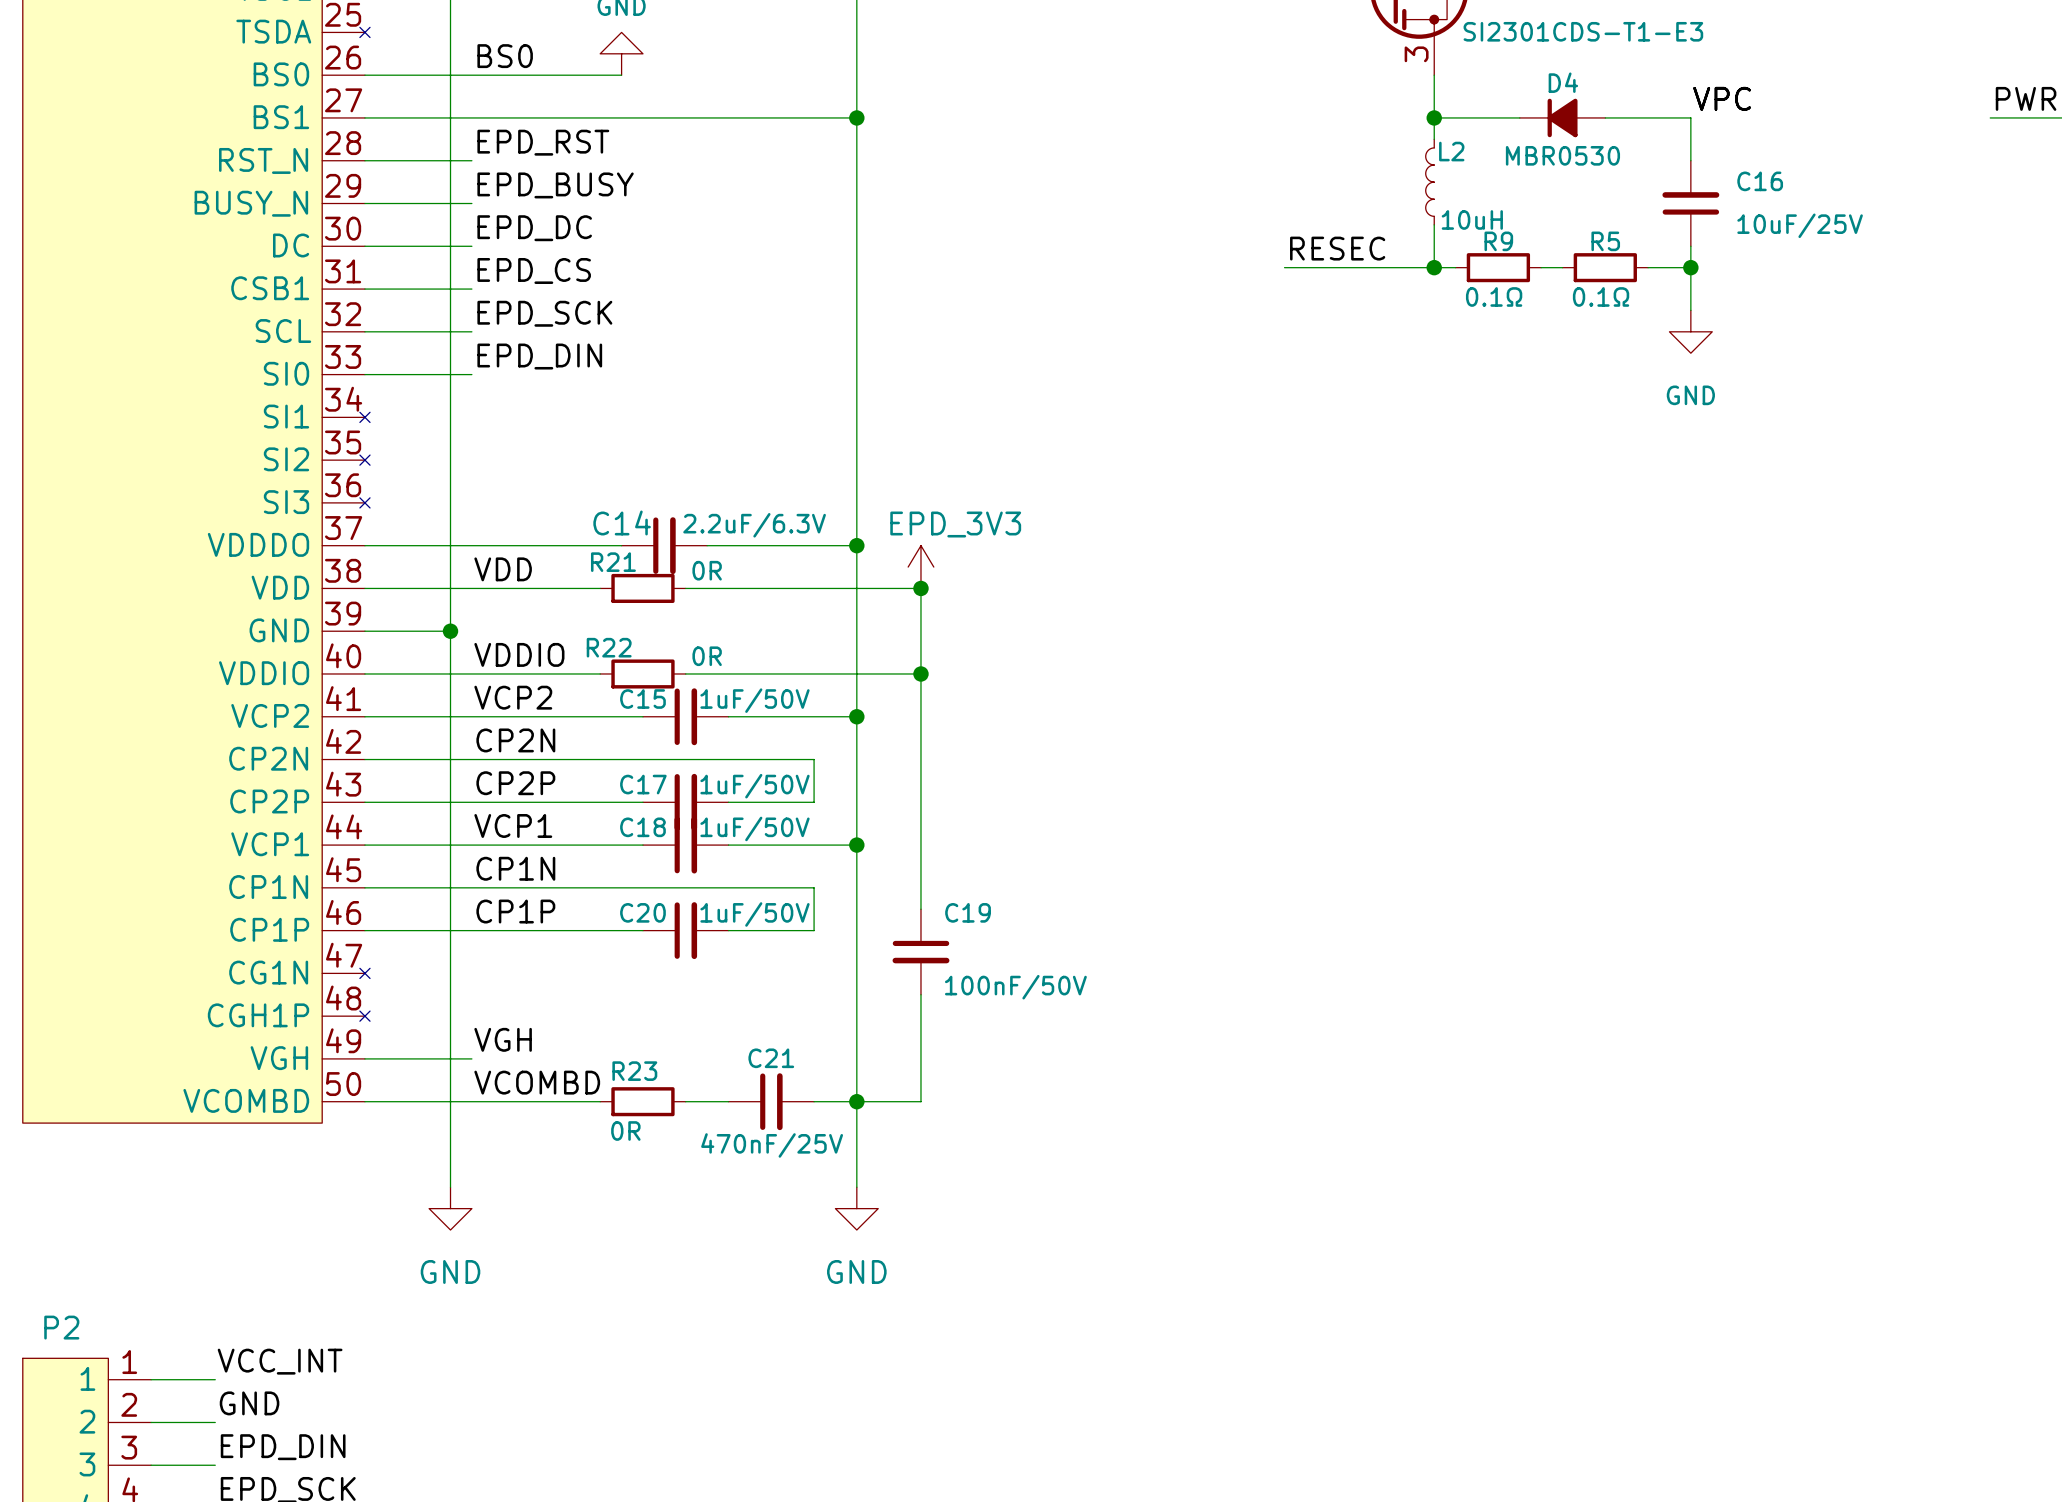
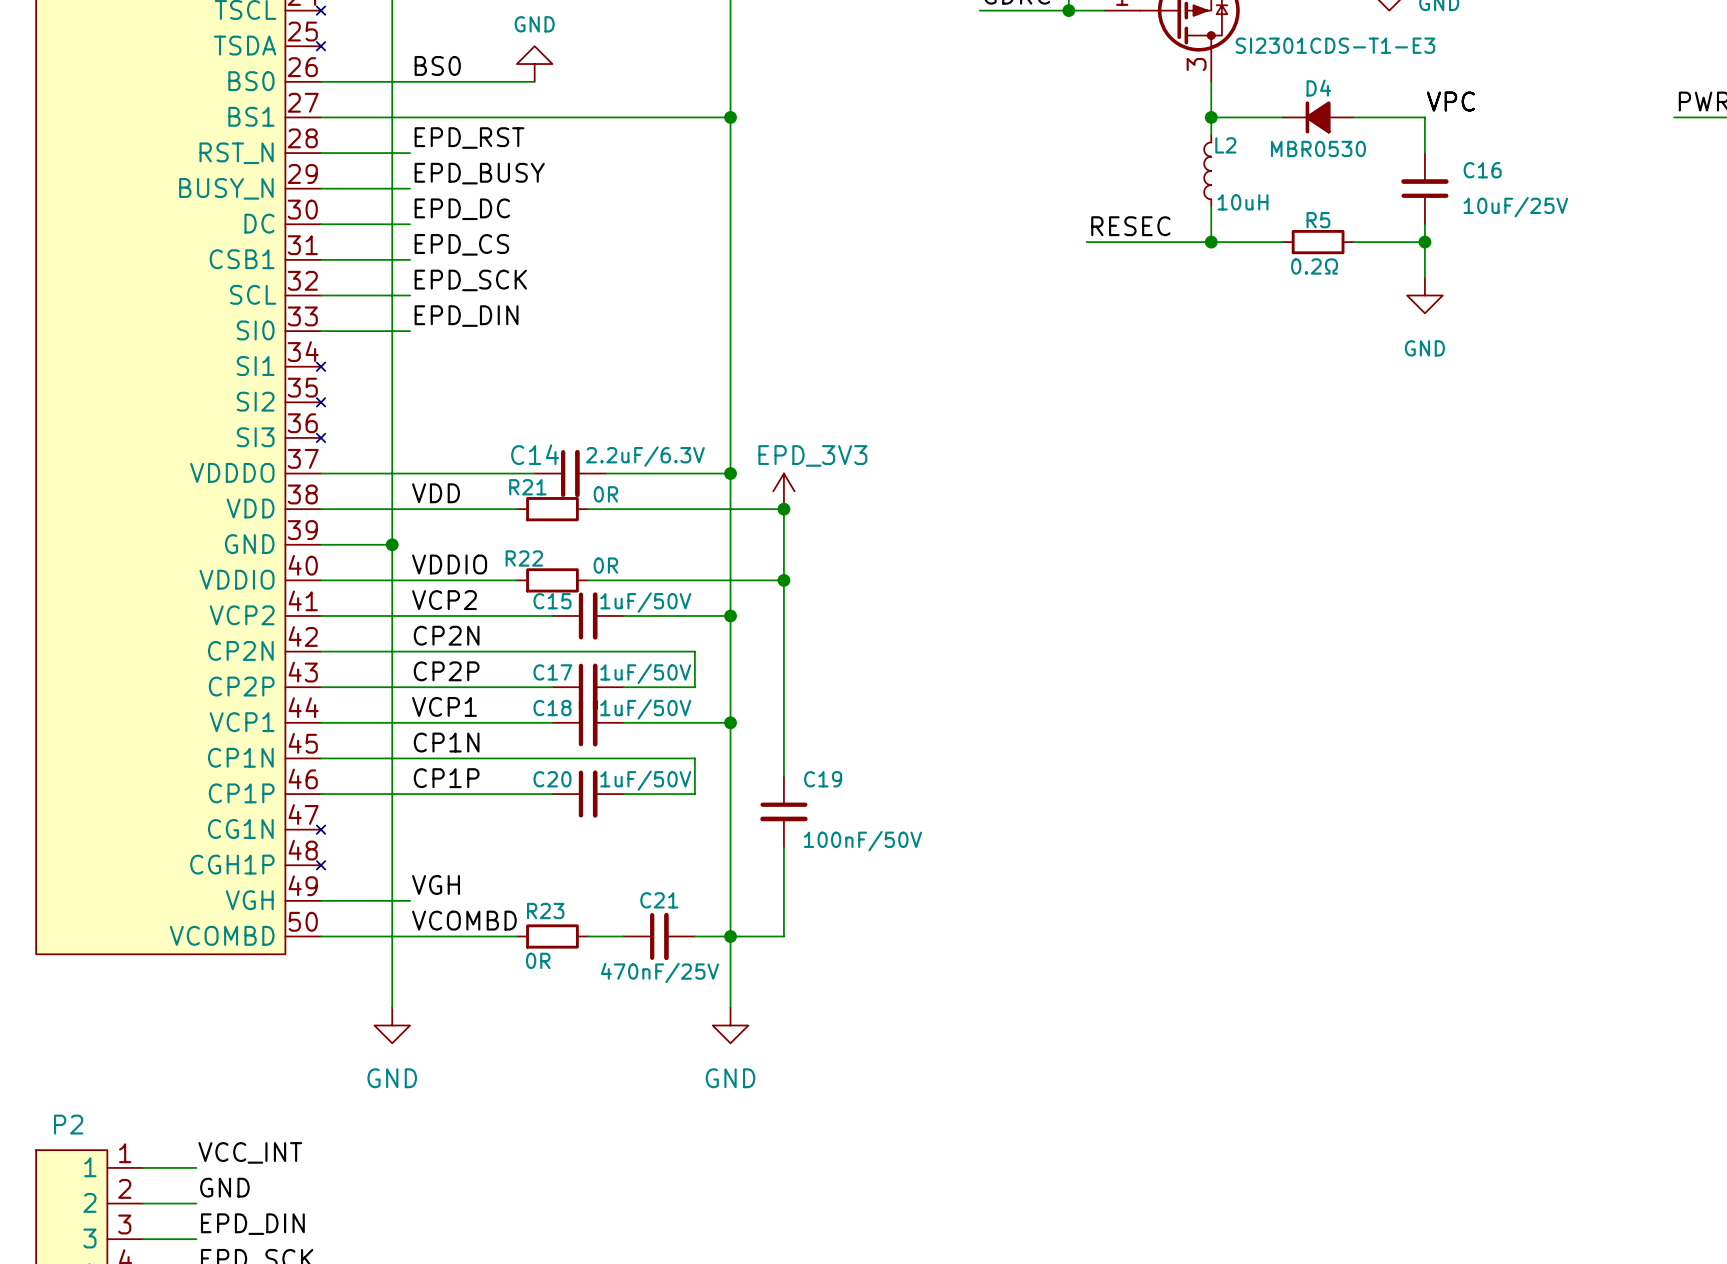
wire: none -> (1229, 242) (1282, 242)
R9: 0.1Ω (1498, 267) -> none
wire: (1541, 267) (1562, 267) -> none
wire: none -> (1353, 242) (1389, 242)
R5 position: (1605, 267) -> (1318, 242)
R5 value: 0.1Ω (1601, 296) -> 0.2Ω (1314, 266)

